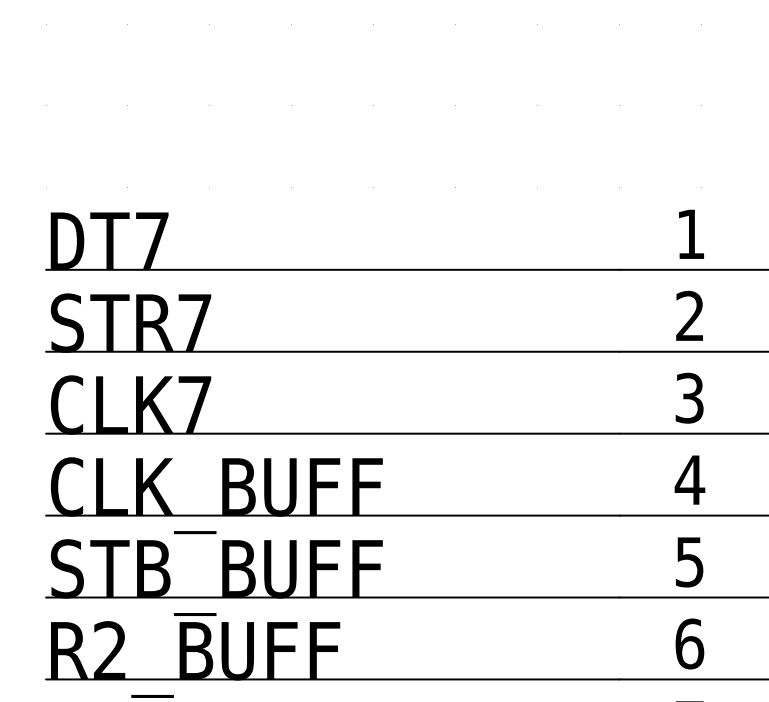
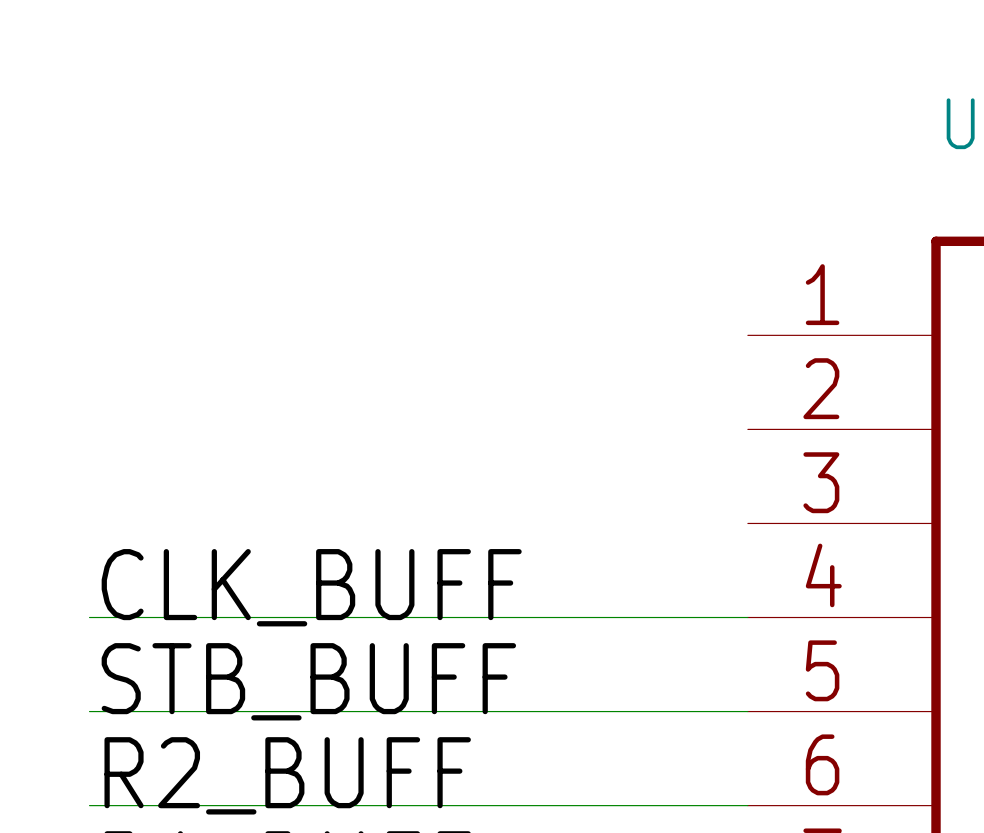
label: DT7 (109, 241) -> none
wire: (46, 269) (619, 269) -> none
label: STR7 (131, 323) -> none
wire: (46, 351) (619, 351) -> none
label: CLK7 (131, 405) -> none
wire: (46, 433) (619, 433) -> none

